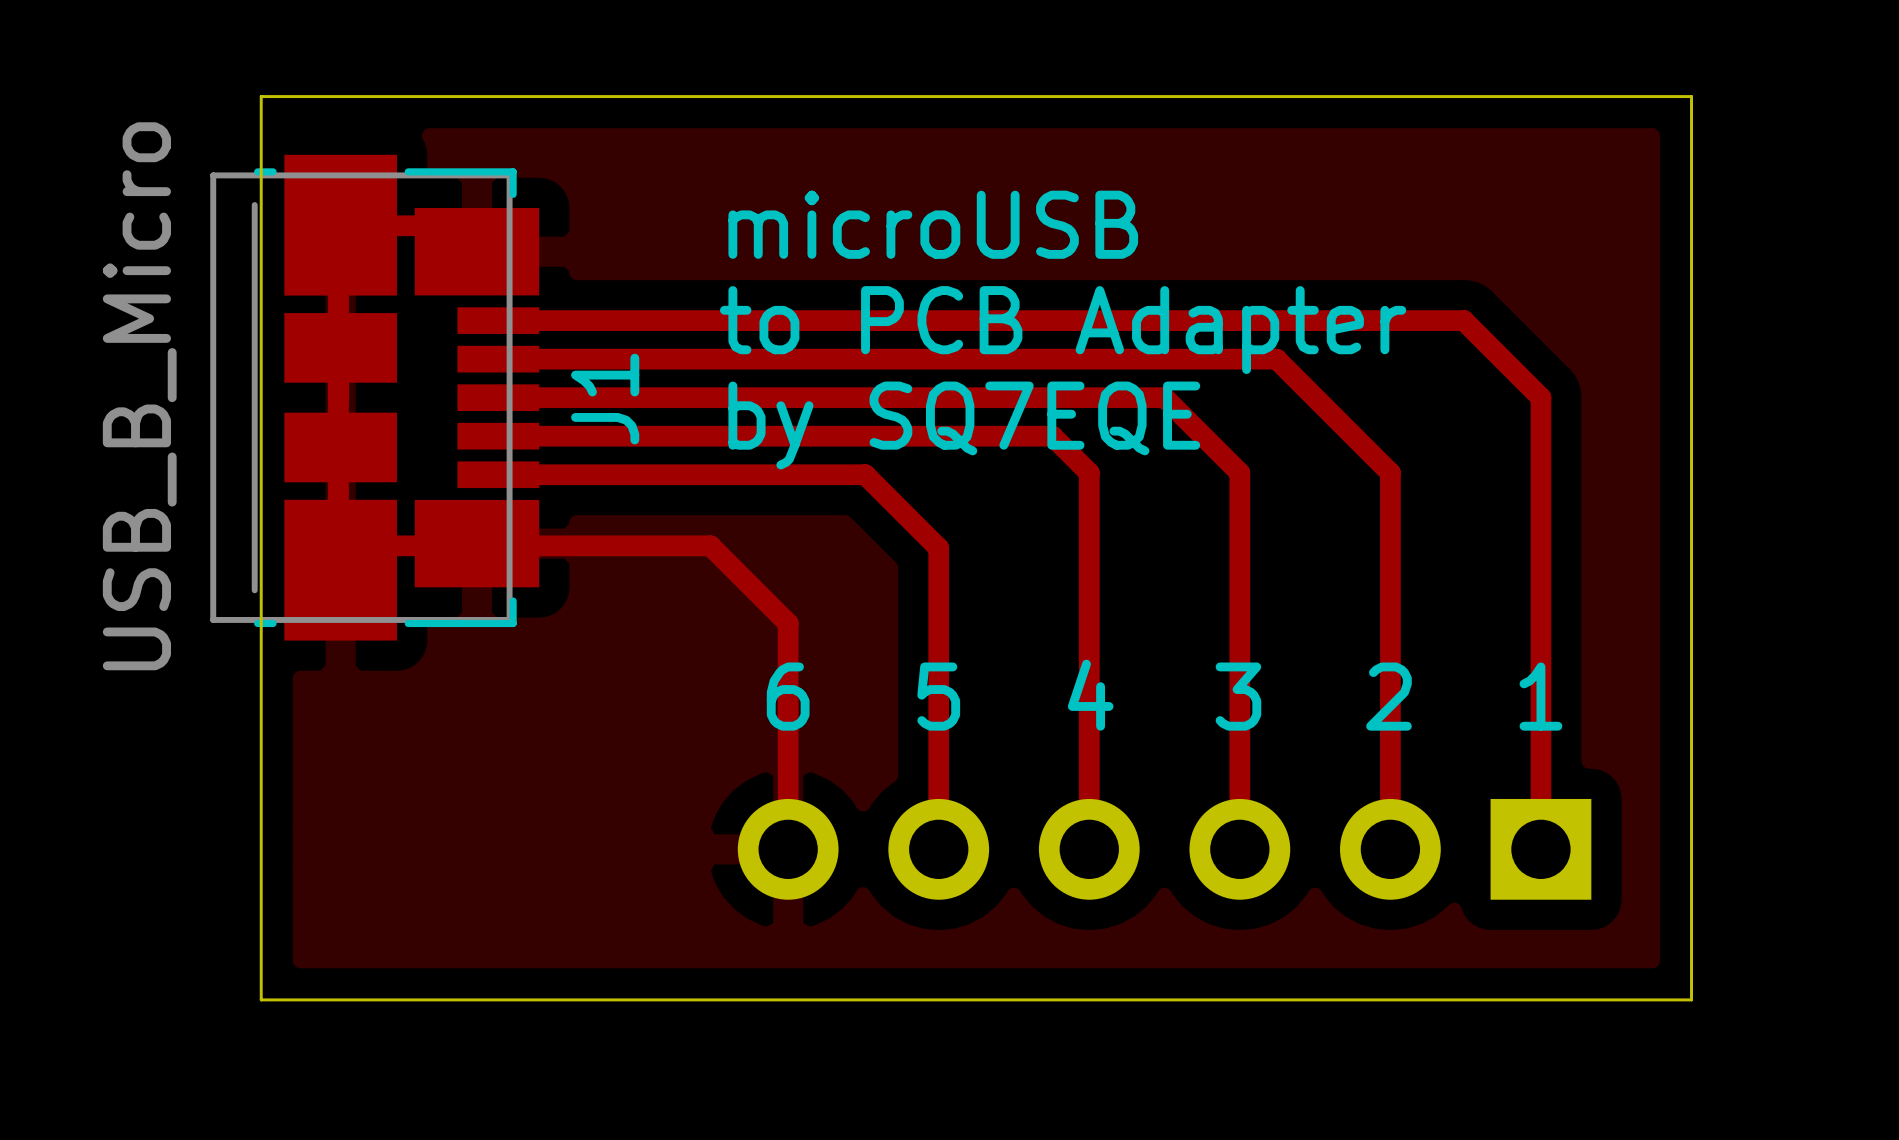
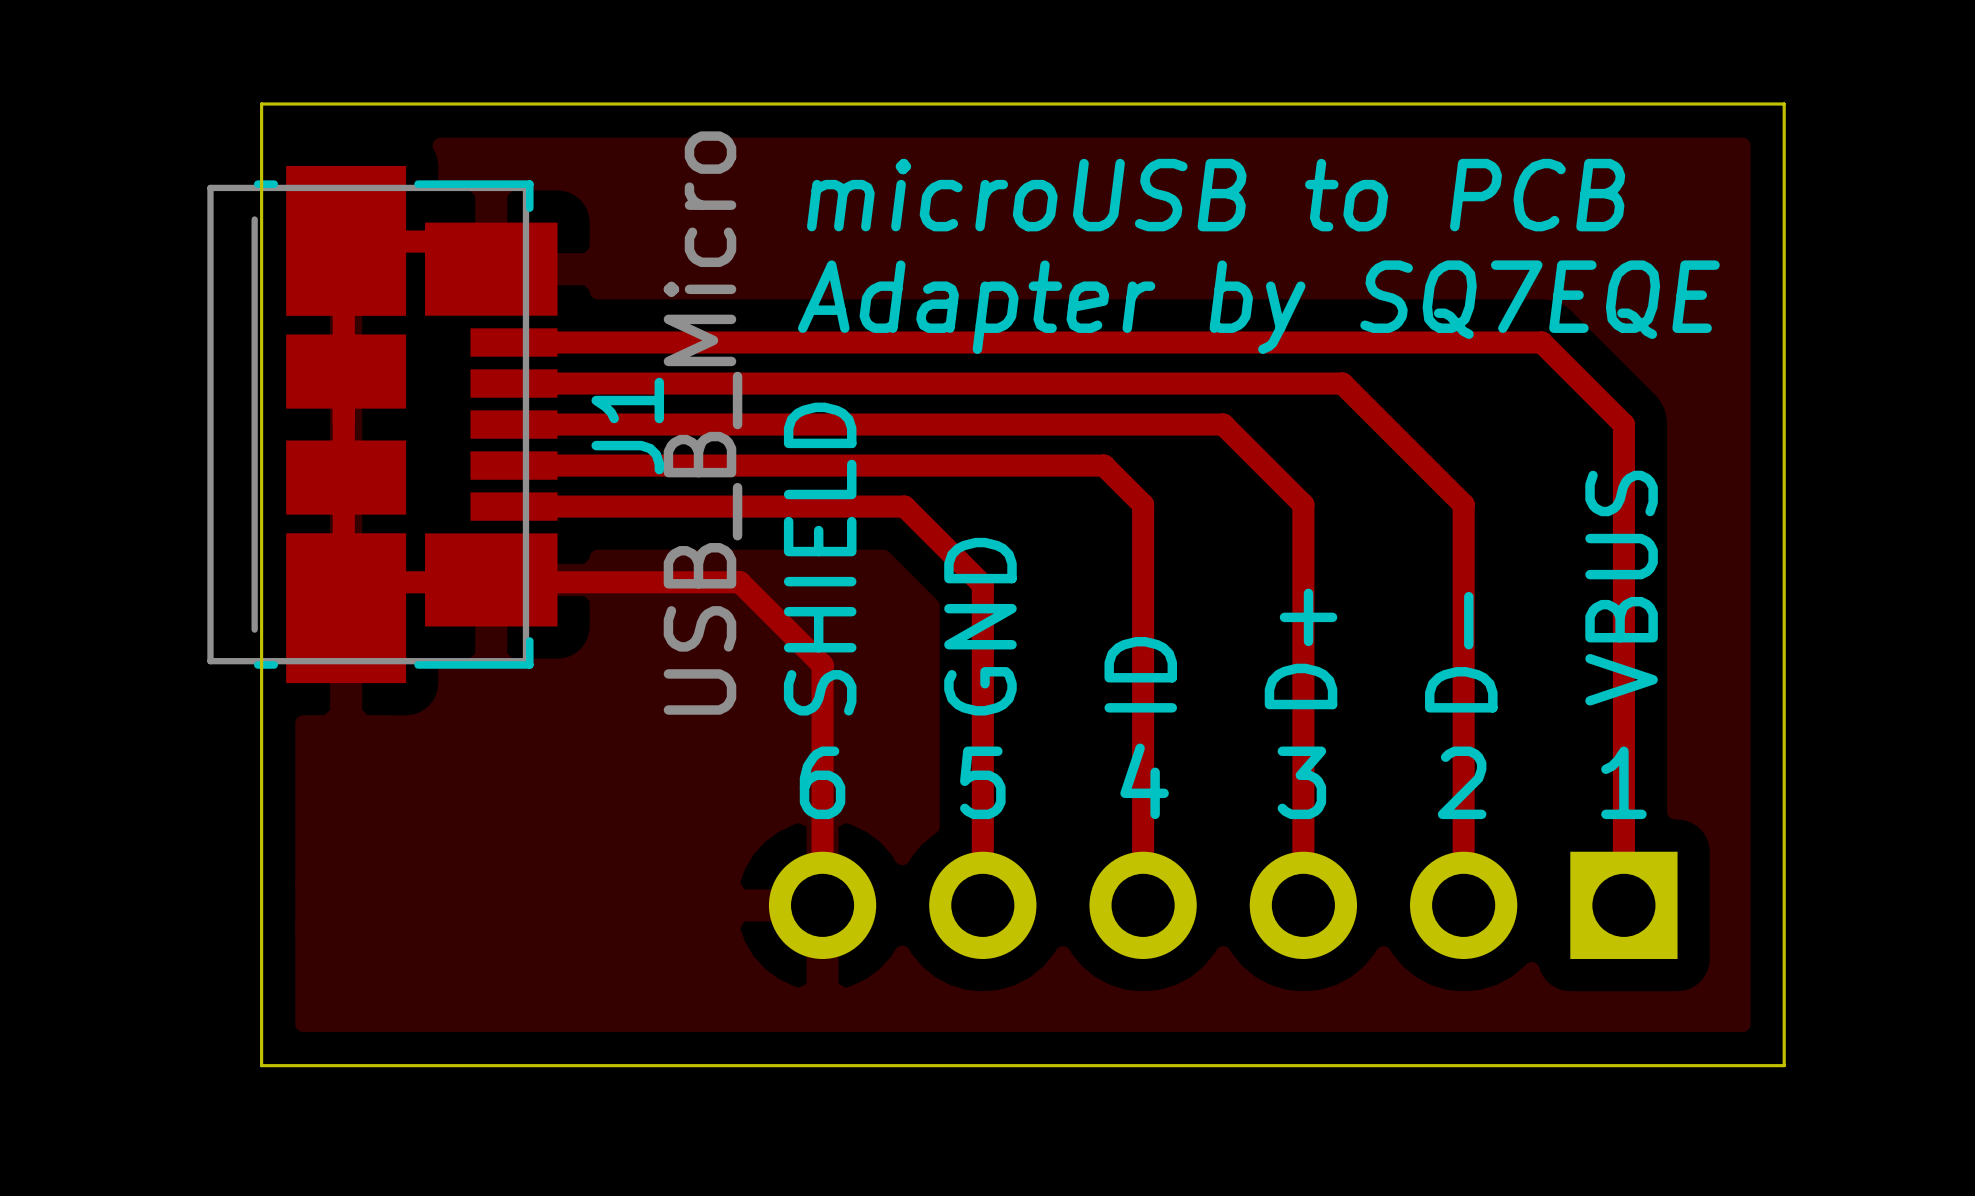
text: microUSB (933, 224) -> microUSB to PCB (1216, 195)
text: none -> Adapter by SQ7EQE (1258, 307)
text: to PCB Adapter (1063, 330) -> none
J1 value position: USB_B_Micro (139, 396) -> USB_B_Micro (703, 423)
text: by SQ7EQE (964, 425) -> none
text: none -> SHIELD (820, 559)
text: none -> VBUS (1621, 588)
text: none -> GND (980, 626)
text: none -> D+ (1301, 648)
text: none -> D- (1461, 652)
text: none -> ID (1140, 674)
text position: 4 (1090, 695) -> 4 (1144, 781)
text position: 6 (788, 696) -> 6 (822, 782)
text position: 5 (938, 696) -> 5 (982, 782)
text position: 3 (1238, 696) -> 3 (1301, 782)
text position: 2 (1388, 696) -> 2 (1462, 782)
text position: 1 (1540, 696) -> 1 (1623, 782)

